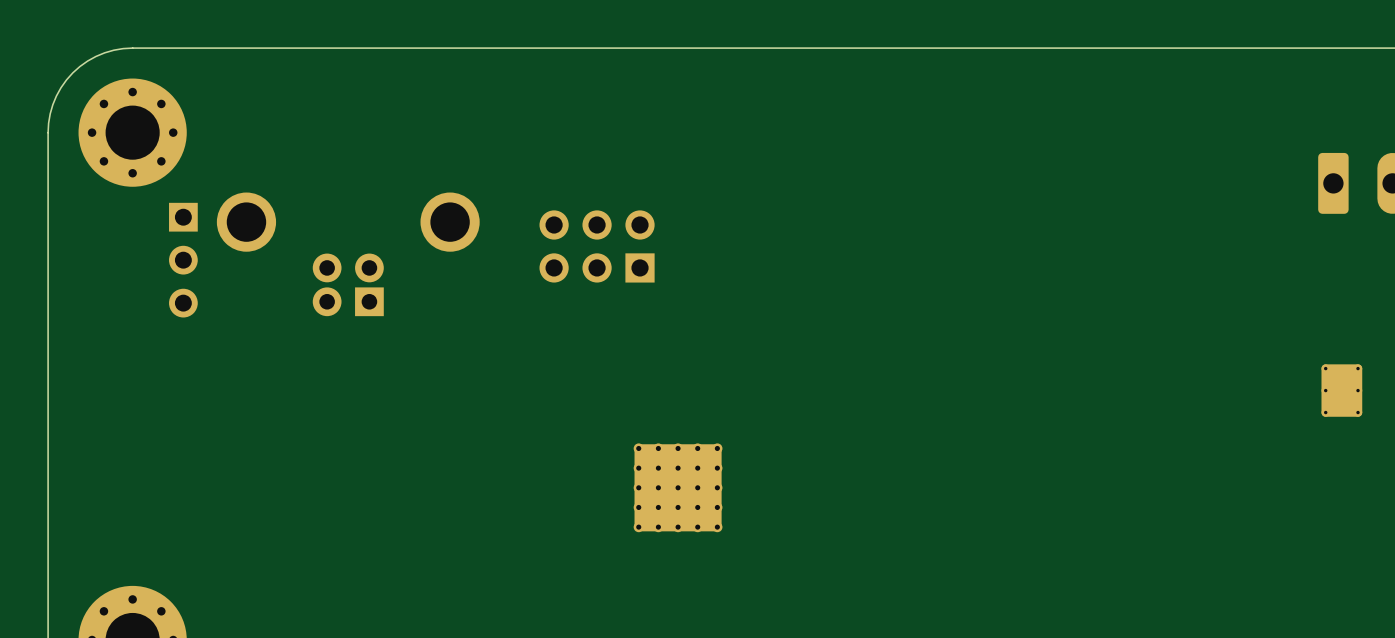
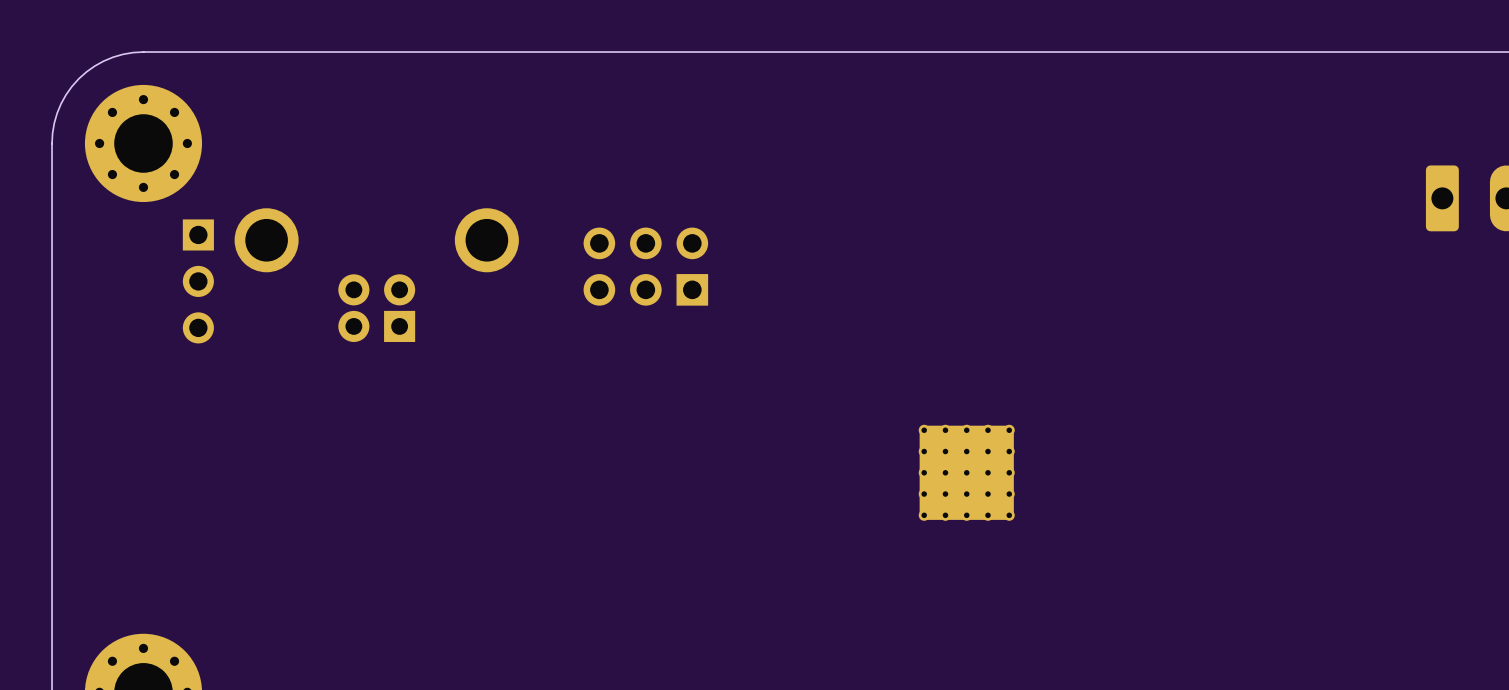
part: (1341, 390) -> none
part position: (678, 487) -> (966, 472)

